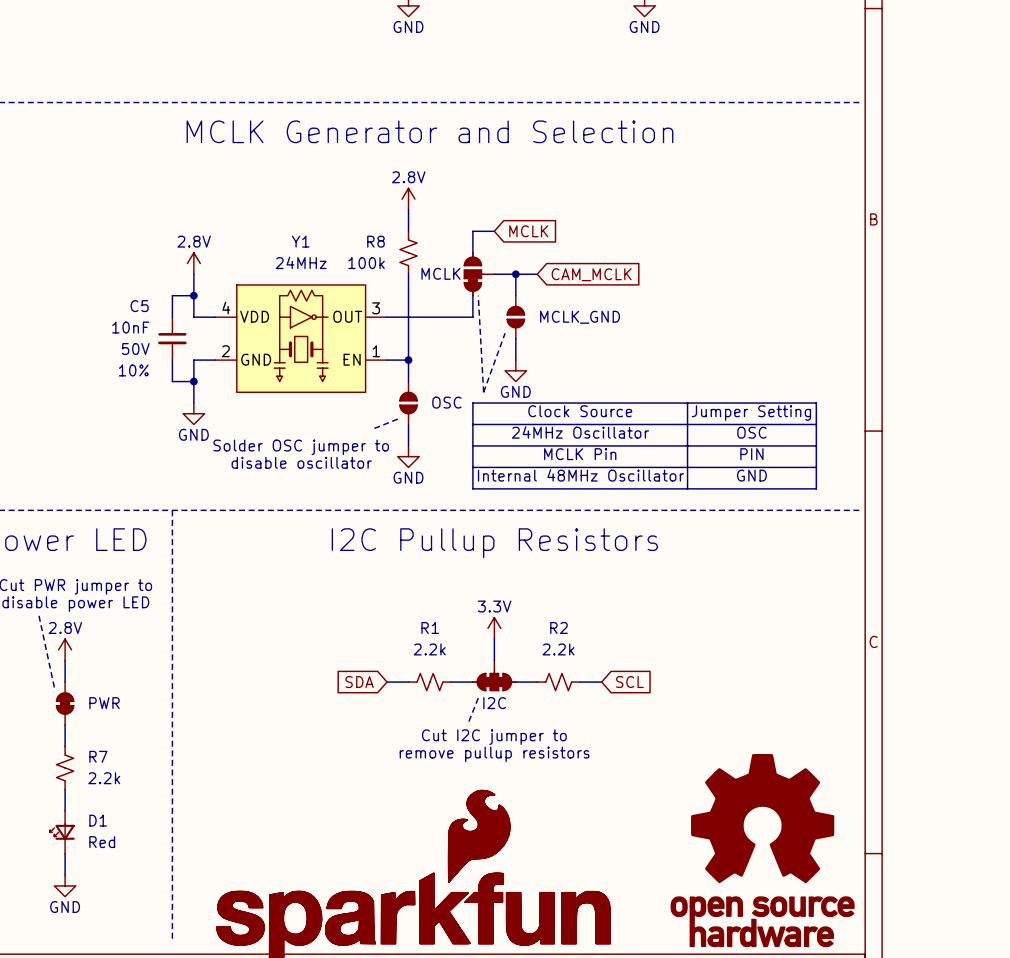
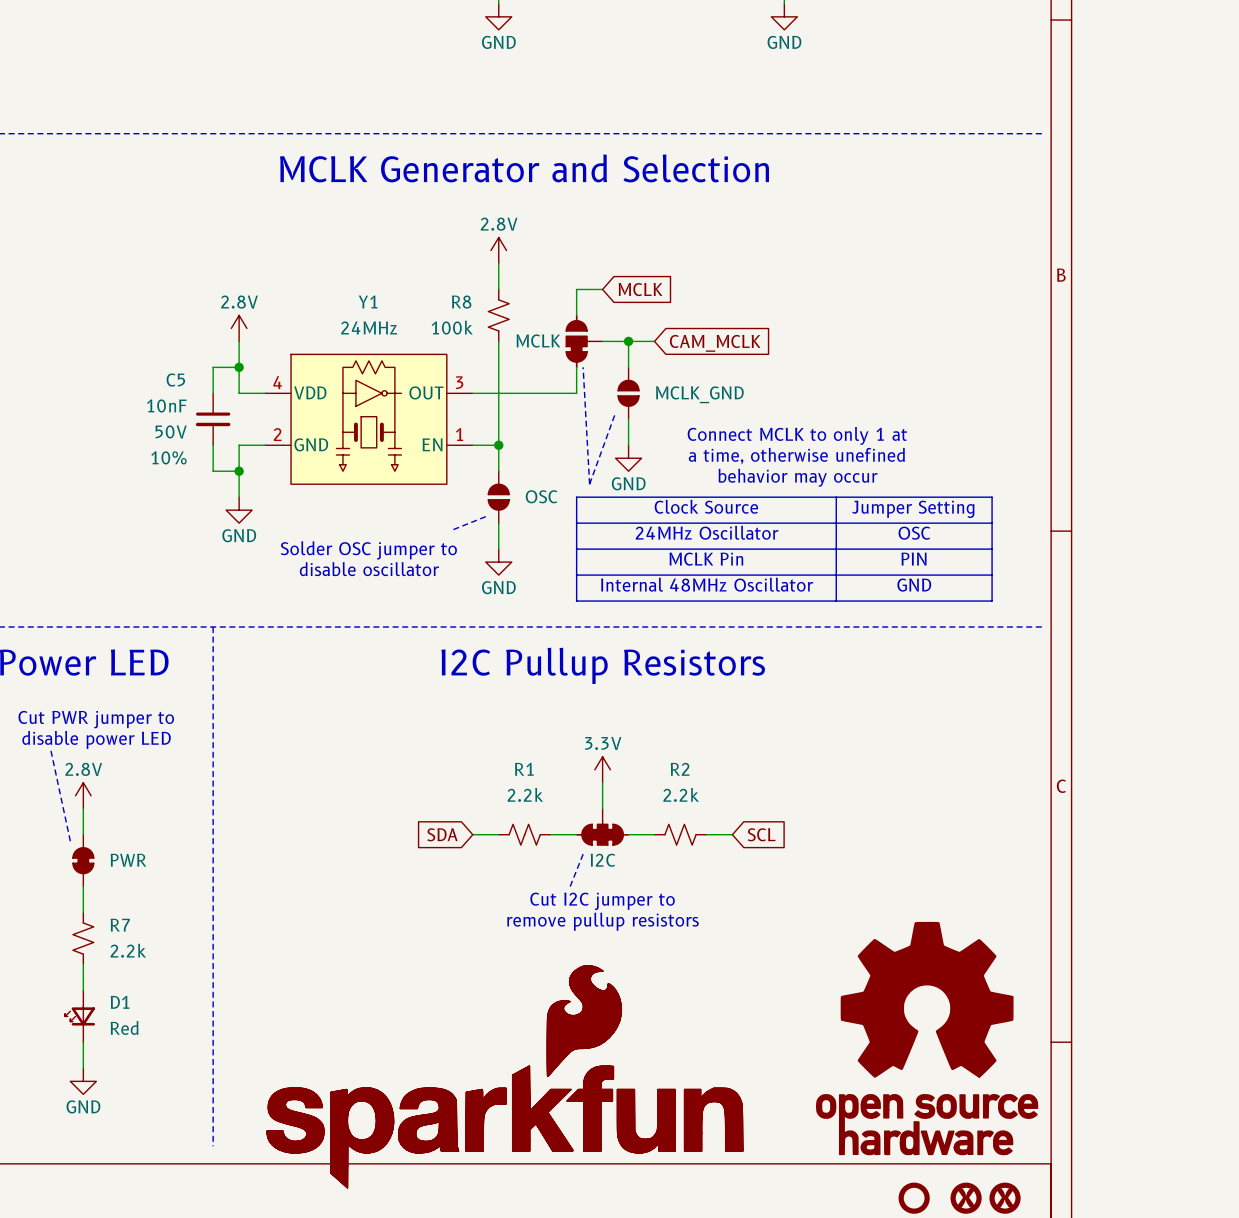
text: none -> Connect MCLK to only 1 at (797, 435)
text: none -> a time, otherwise unefined (796, 456)
text: none -> behavior may occur (798, 477)

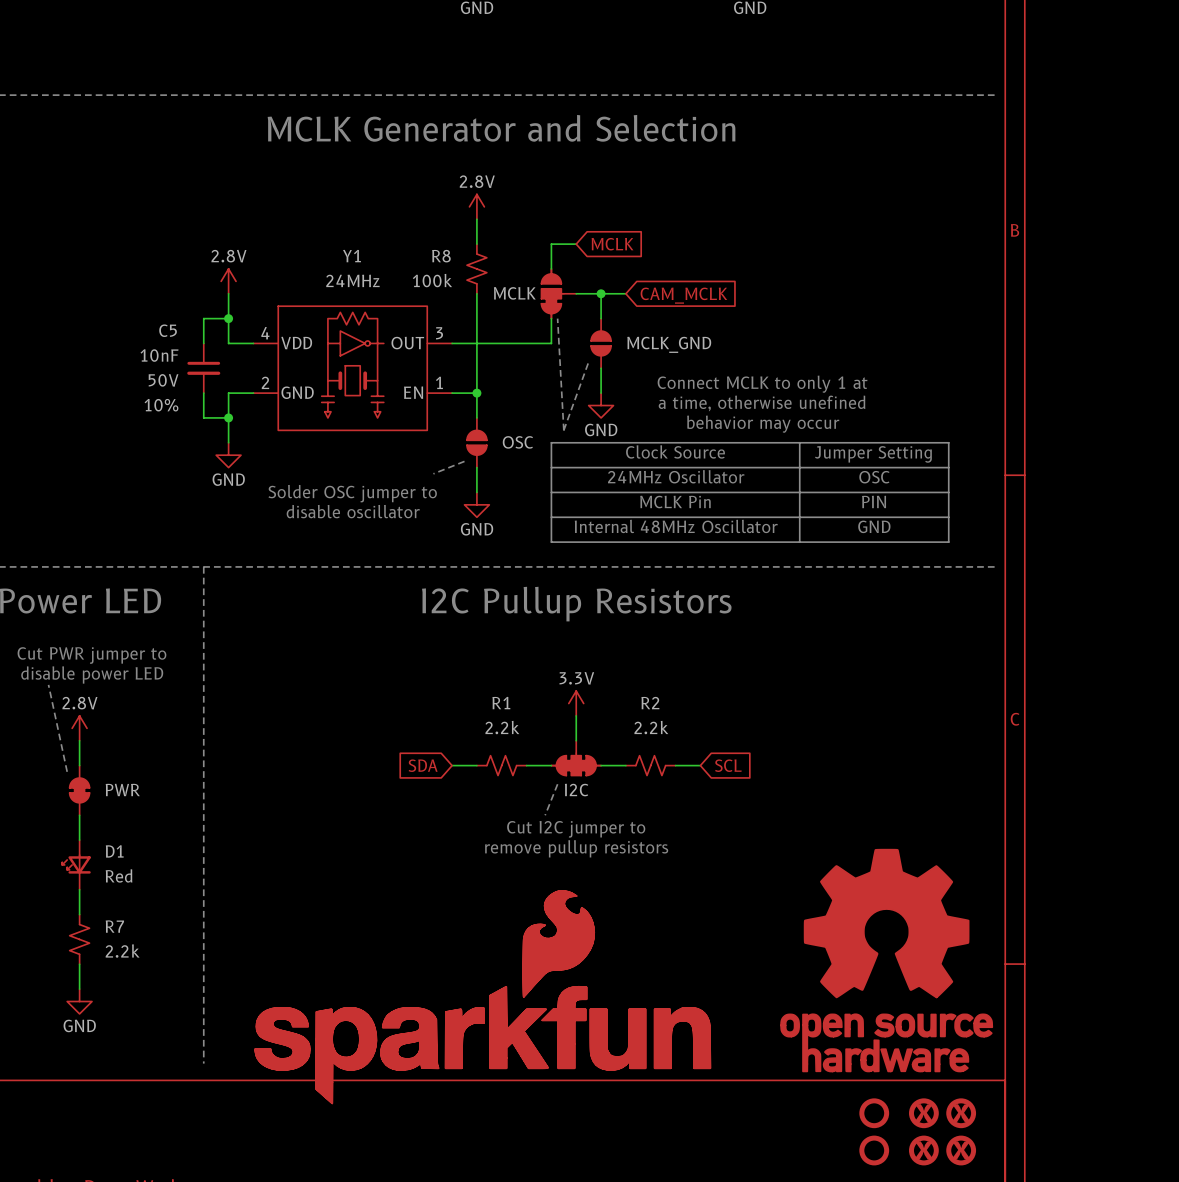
R7 position: (83, 938) -> (79, 939)
D1 position: (80, 1016) -> (76, 864)

